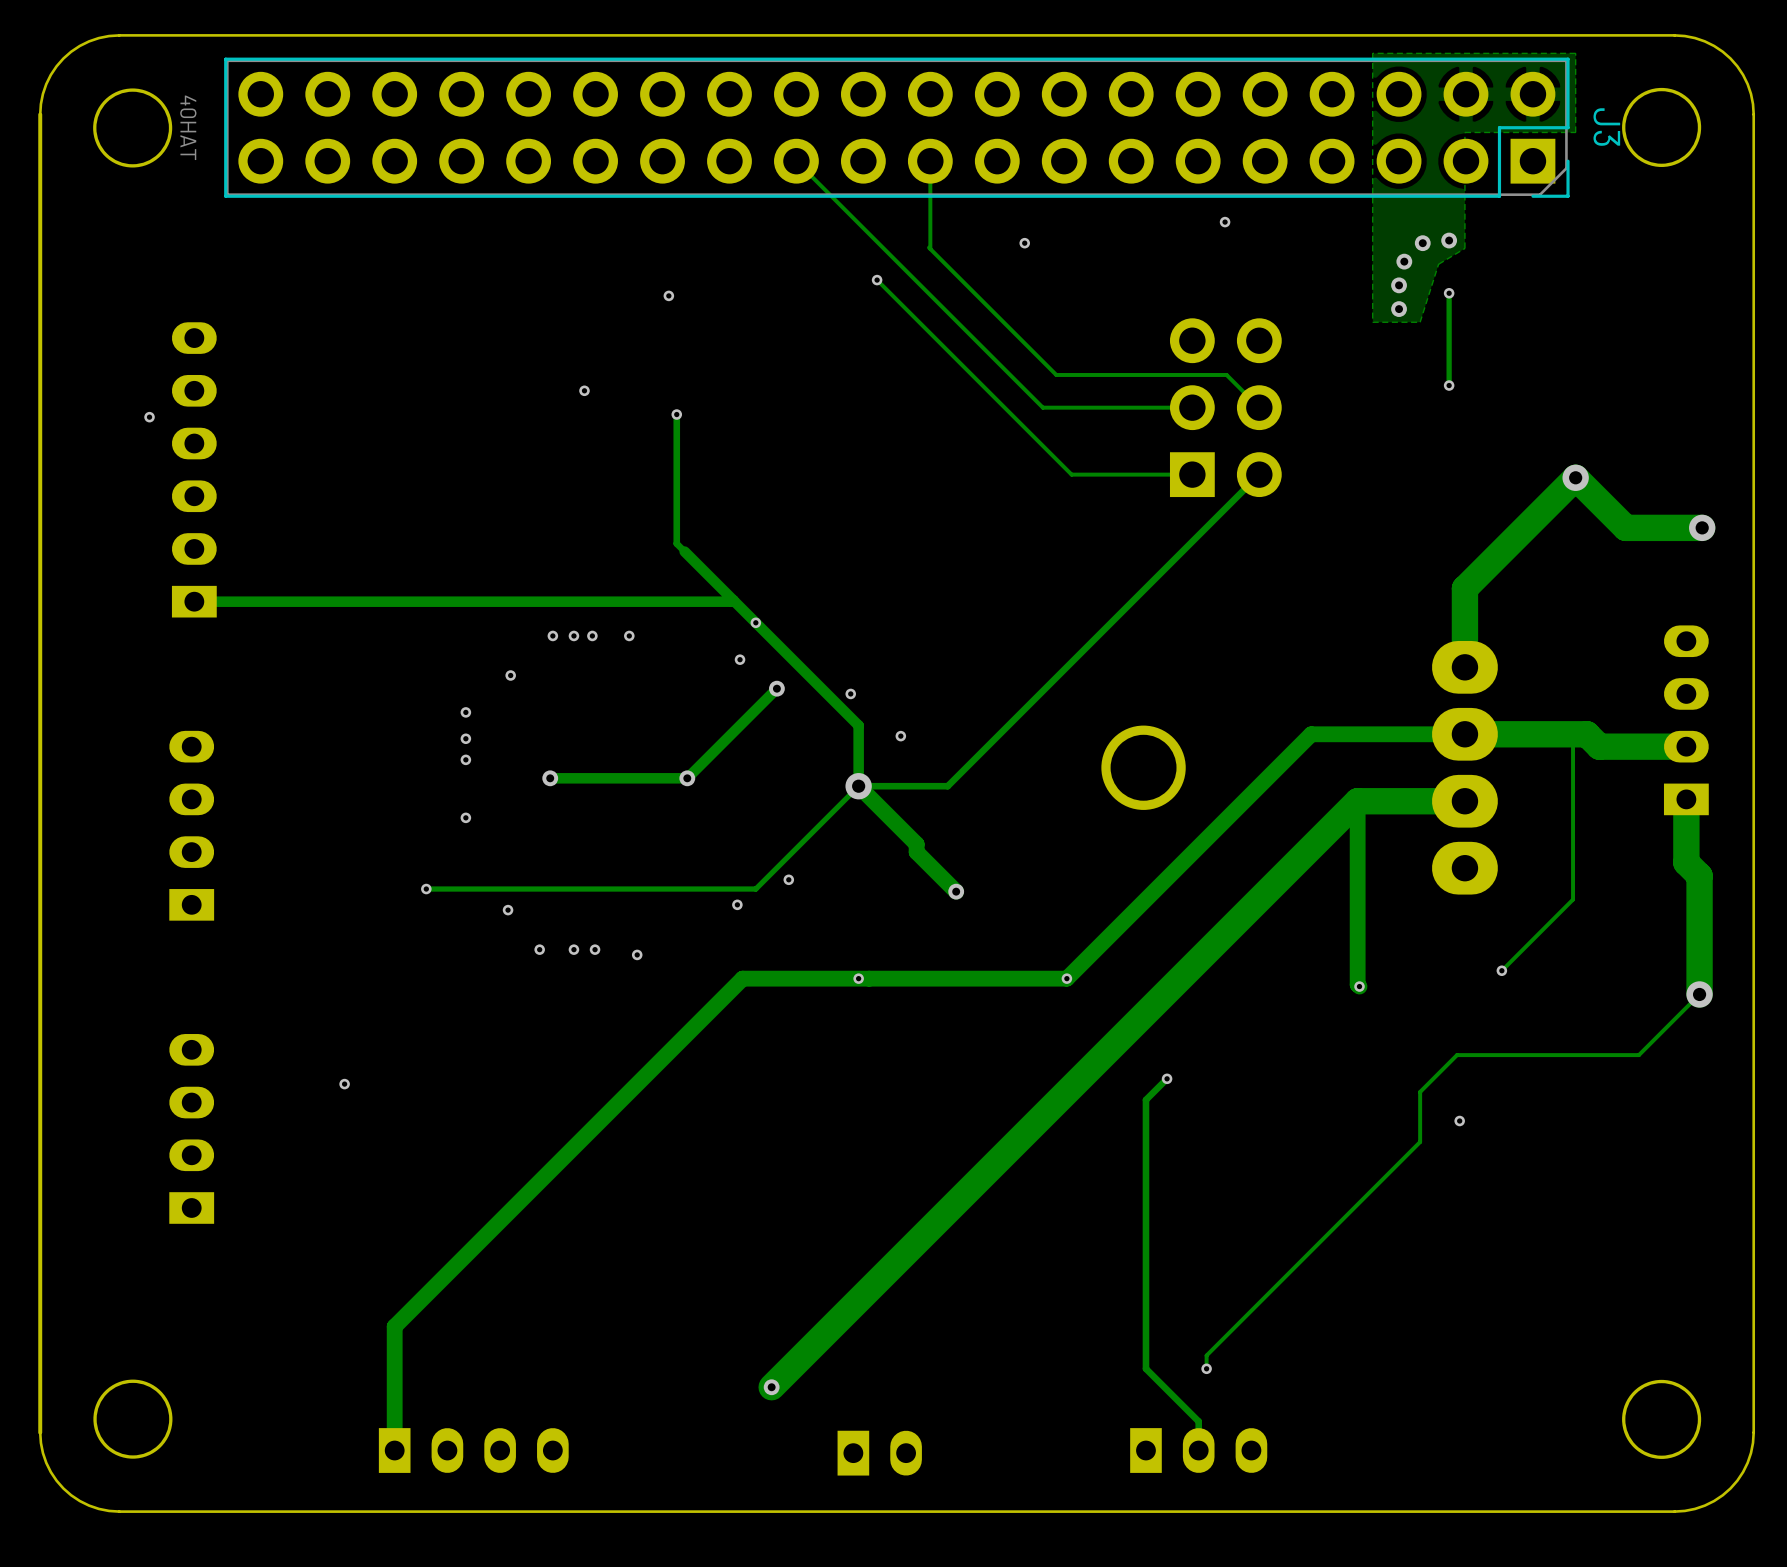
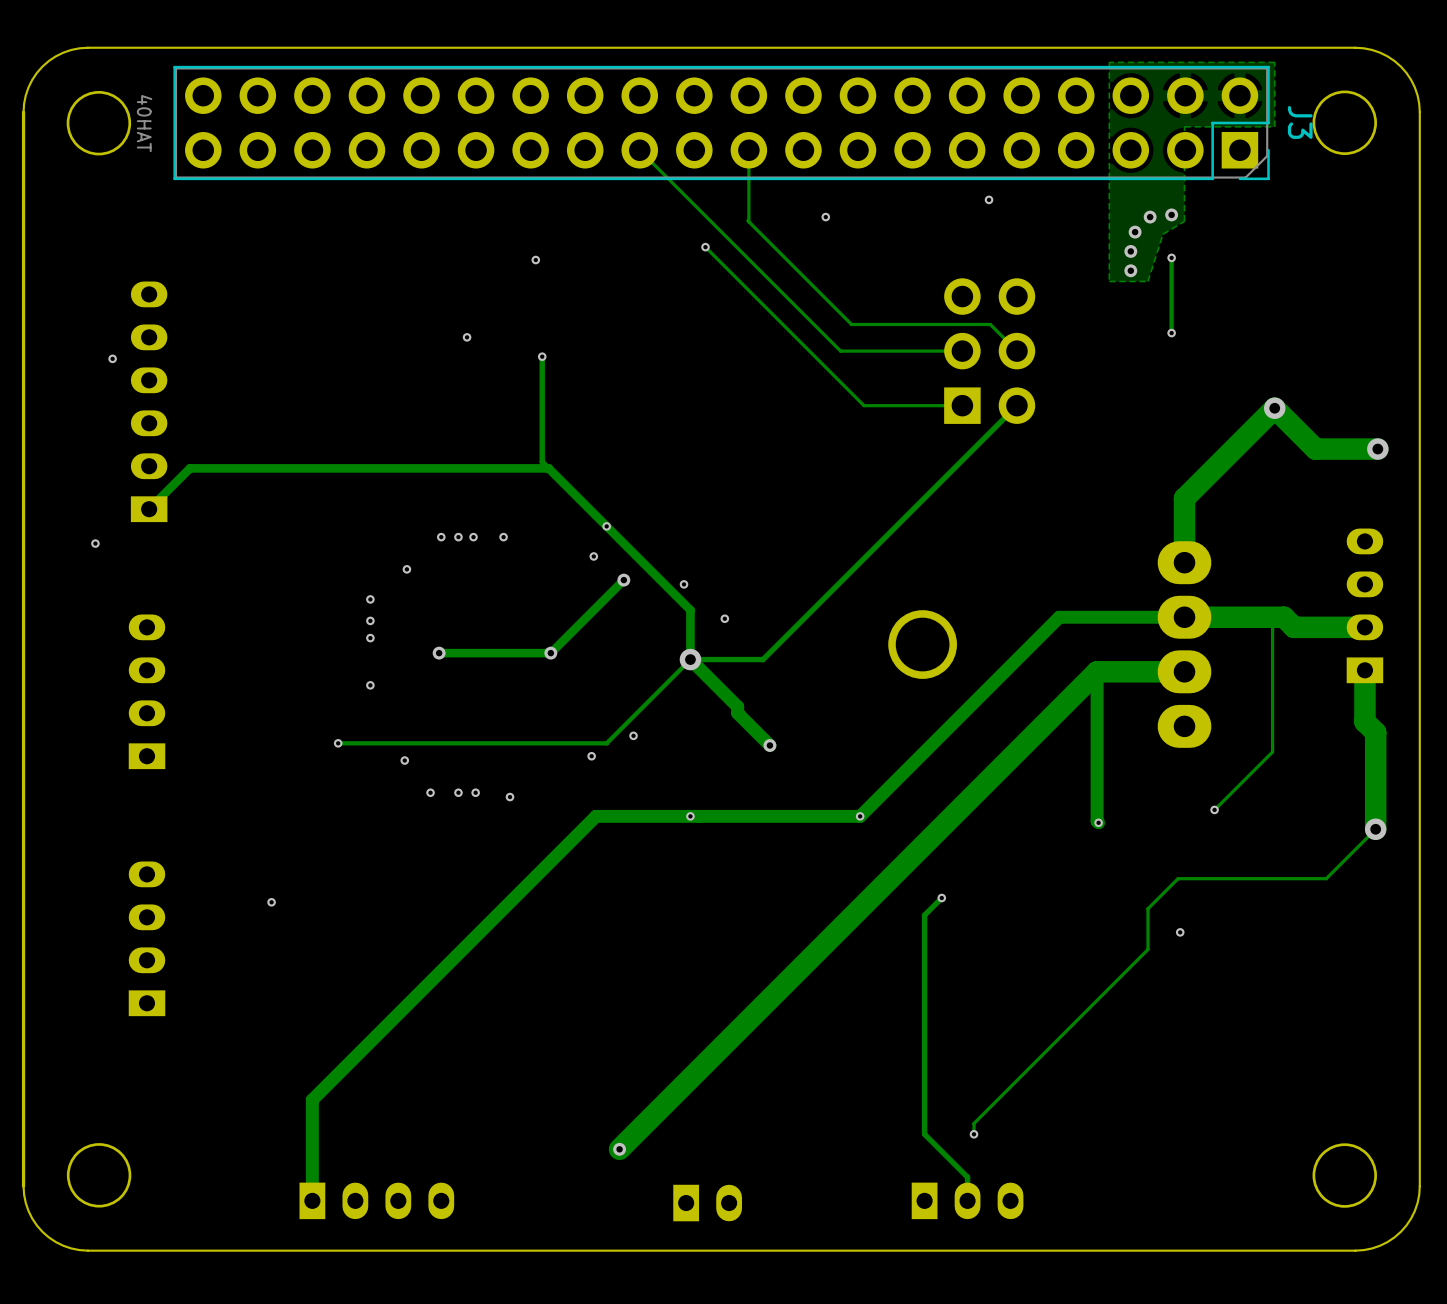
track: (733, 600) (194, 601) -> (548, 468) (189, 468) (149, 509)
via: none -> (95, 543)

